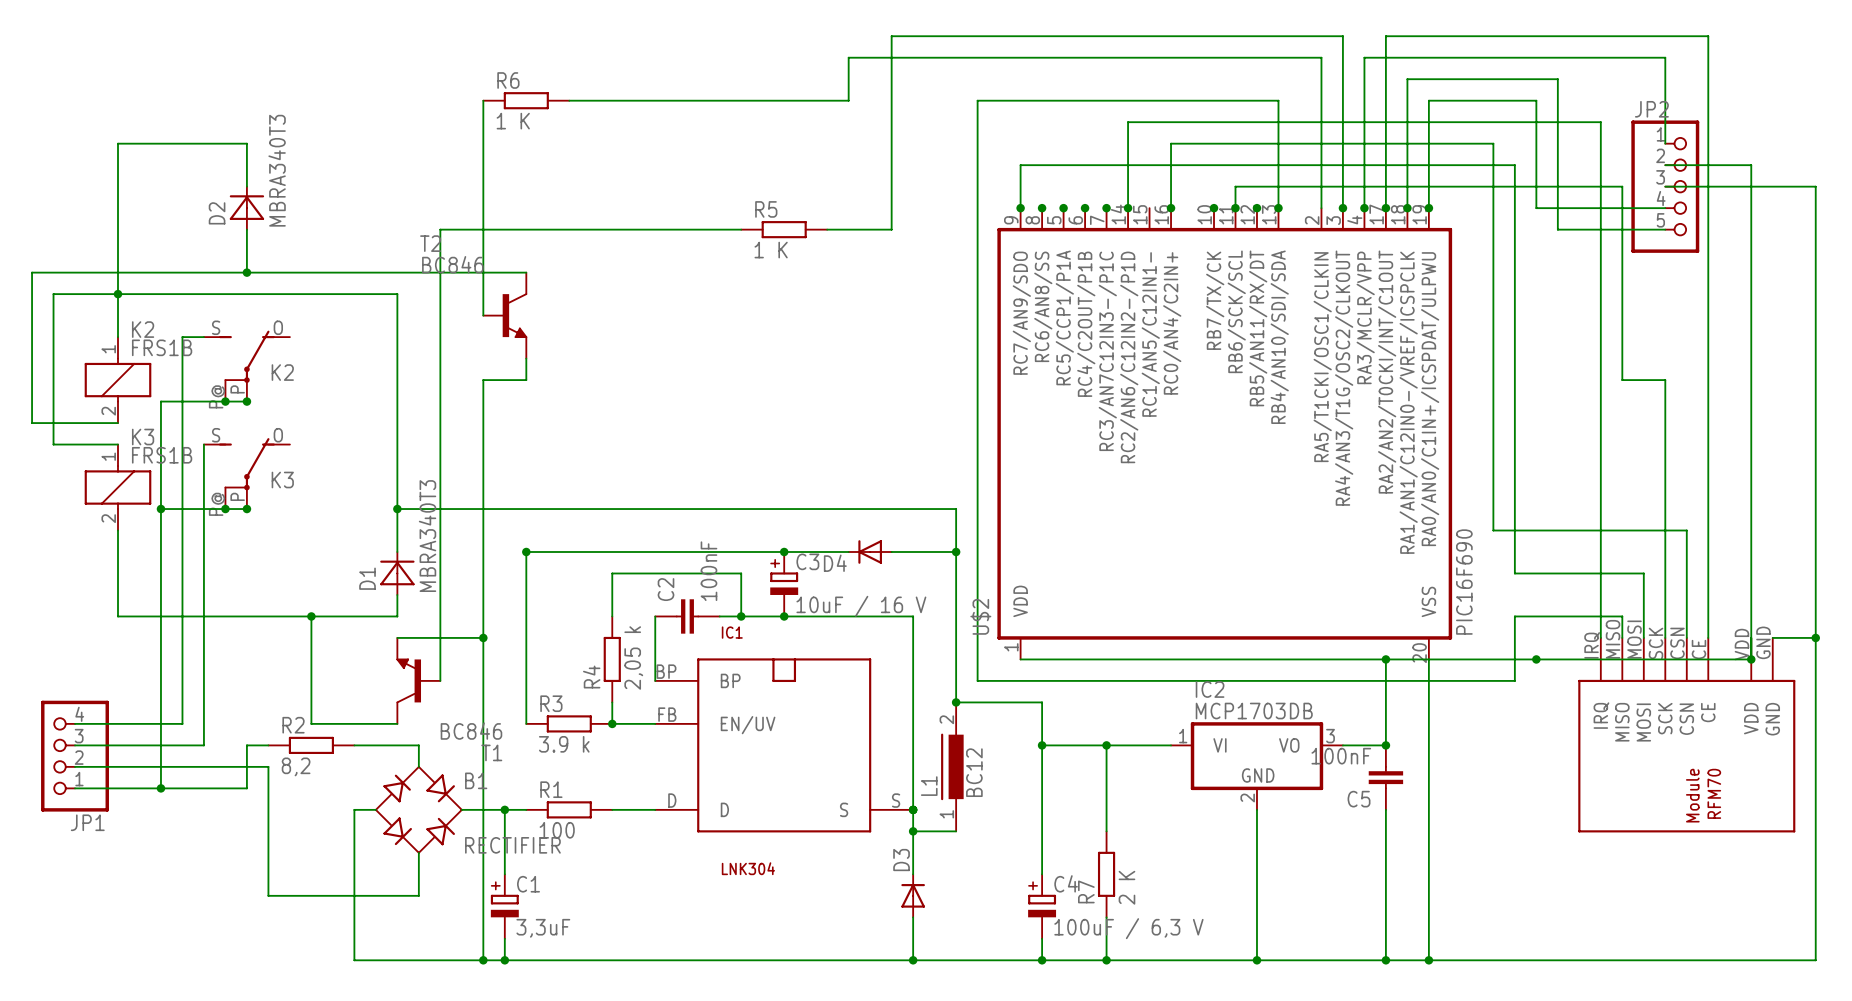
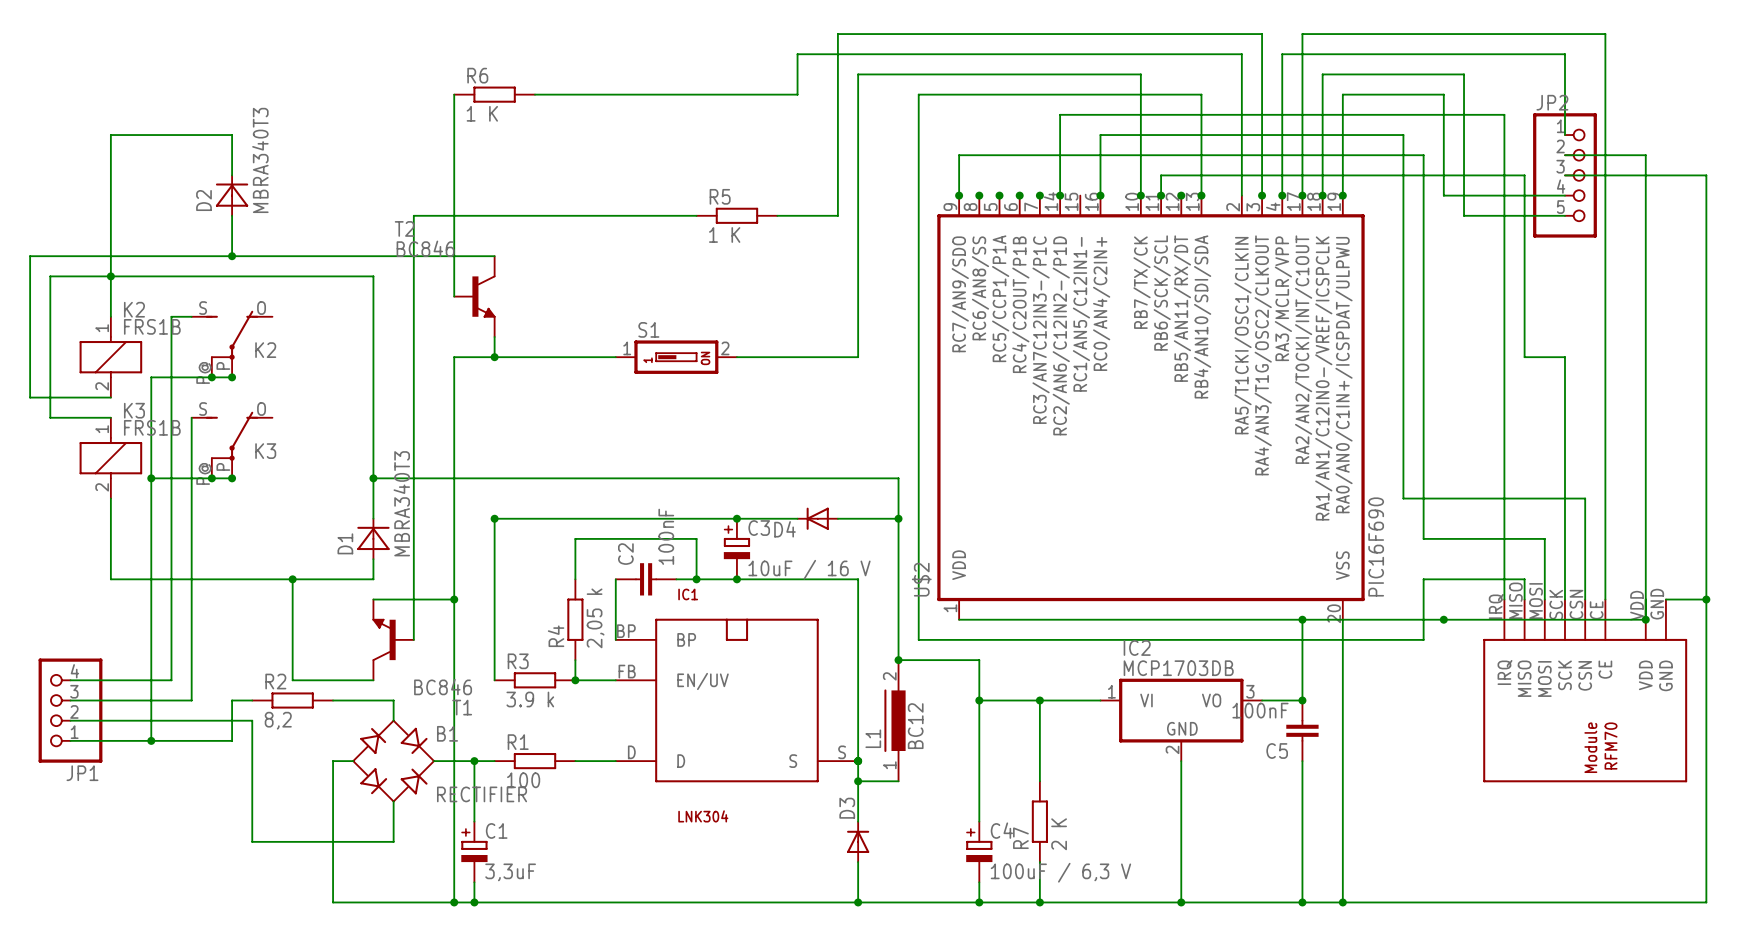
wire: none -> (1140, 195) (1140, 74) (858, 74) (858, 357) (736, 357)
wire: none -> (494, 357) (615, 357)
junction: none -> (494, 357)
S1: none -> (676, 357)

